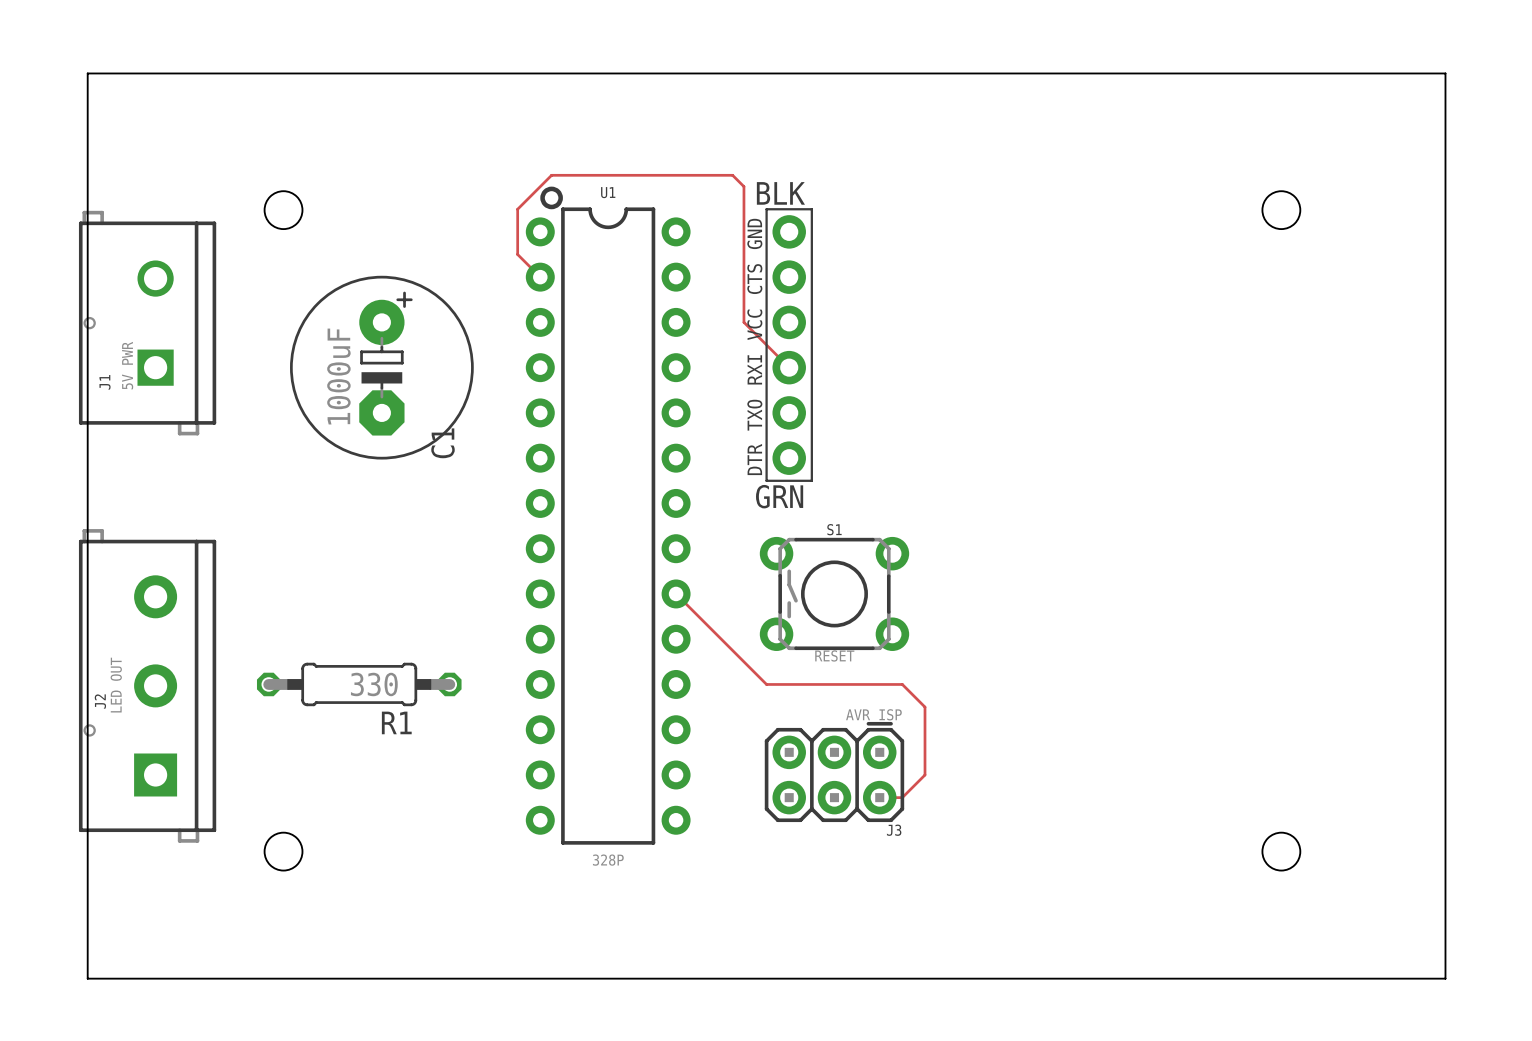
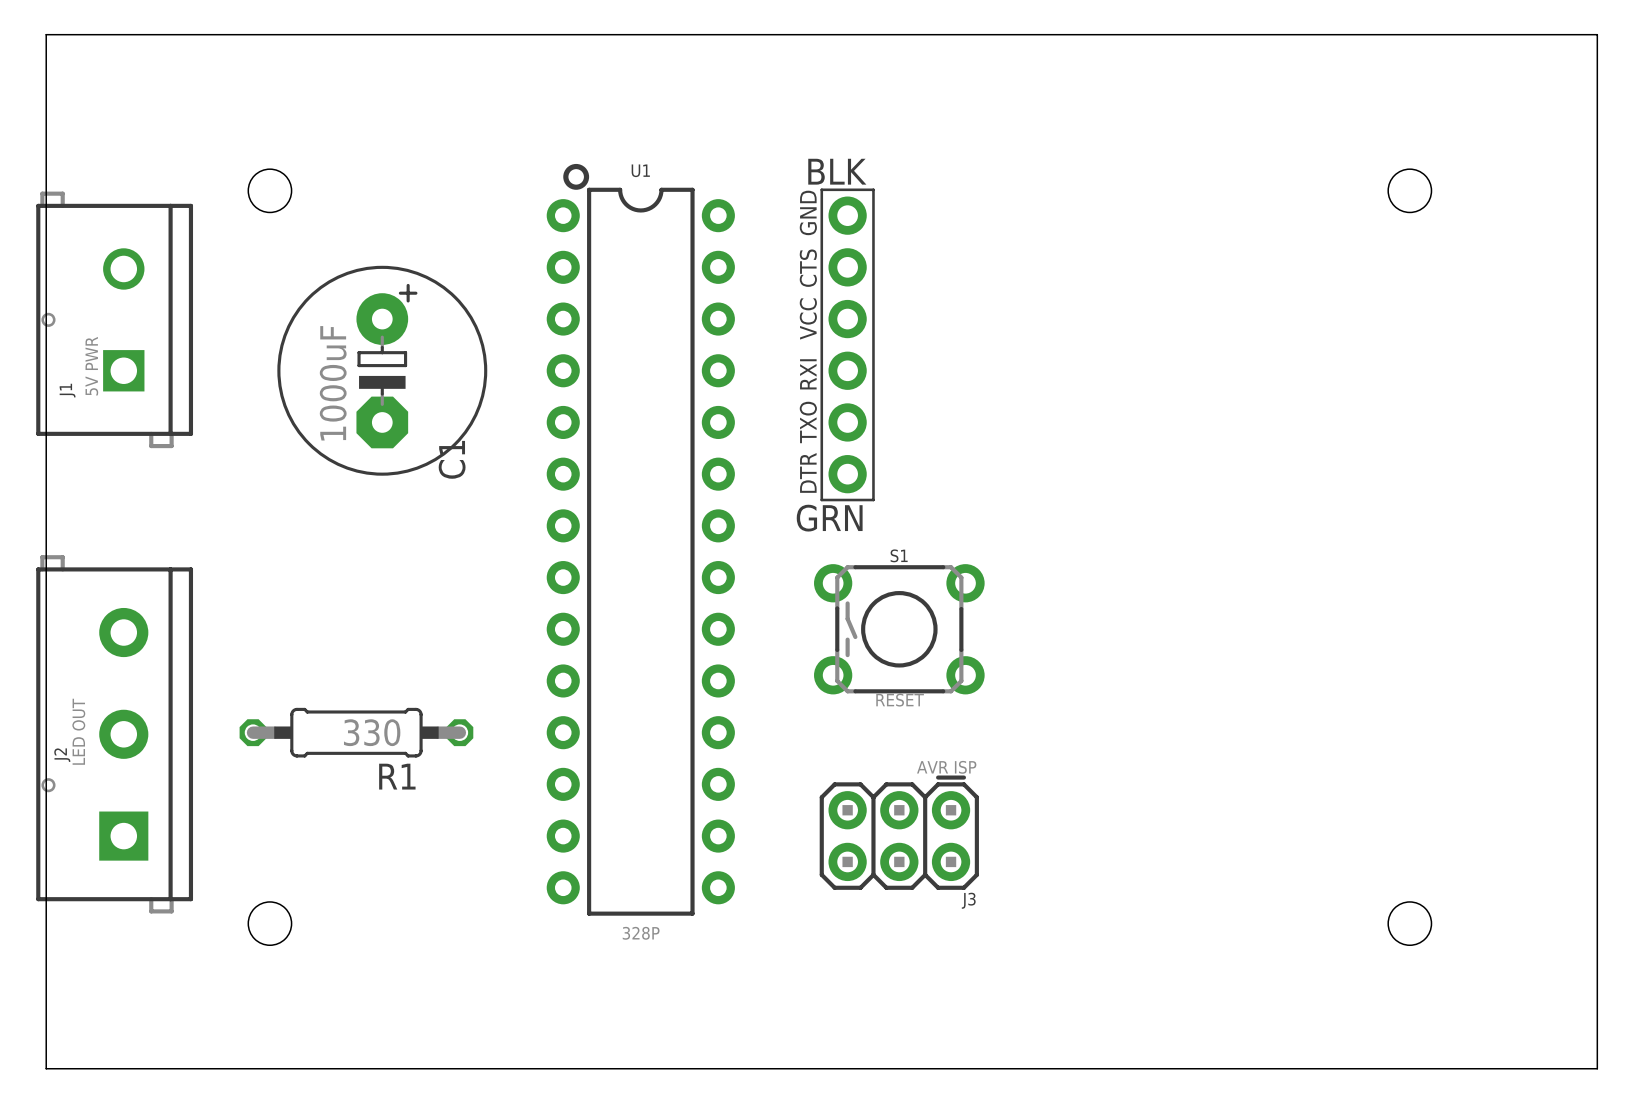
track: (540, 277) (517, 254) (517, 209) (551, 175) (732, 175) (743, 186) (743, 322) (789, 367) -> none
track: (676, 593) (766, 684) (902, 684) (925, 707) (925, 774) (902, 797) (879, 797) -> none

